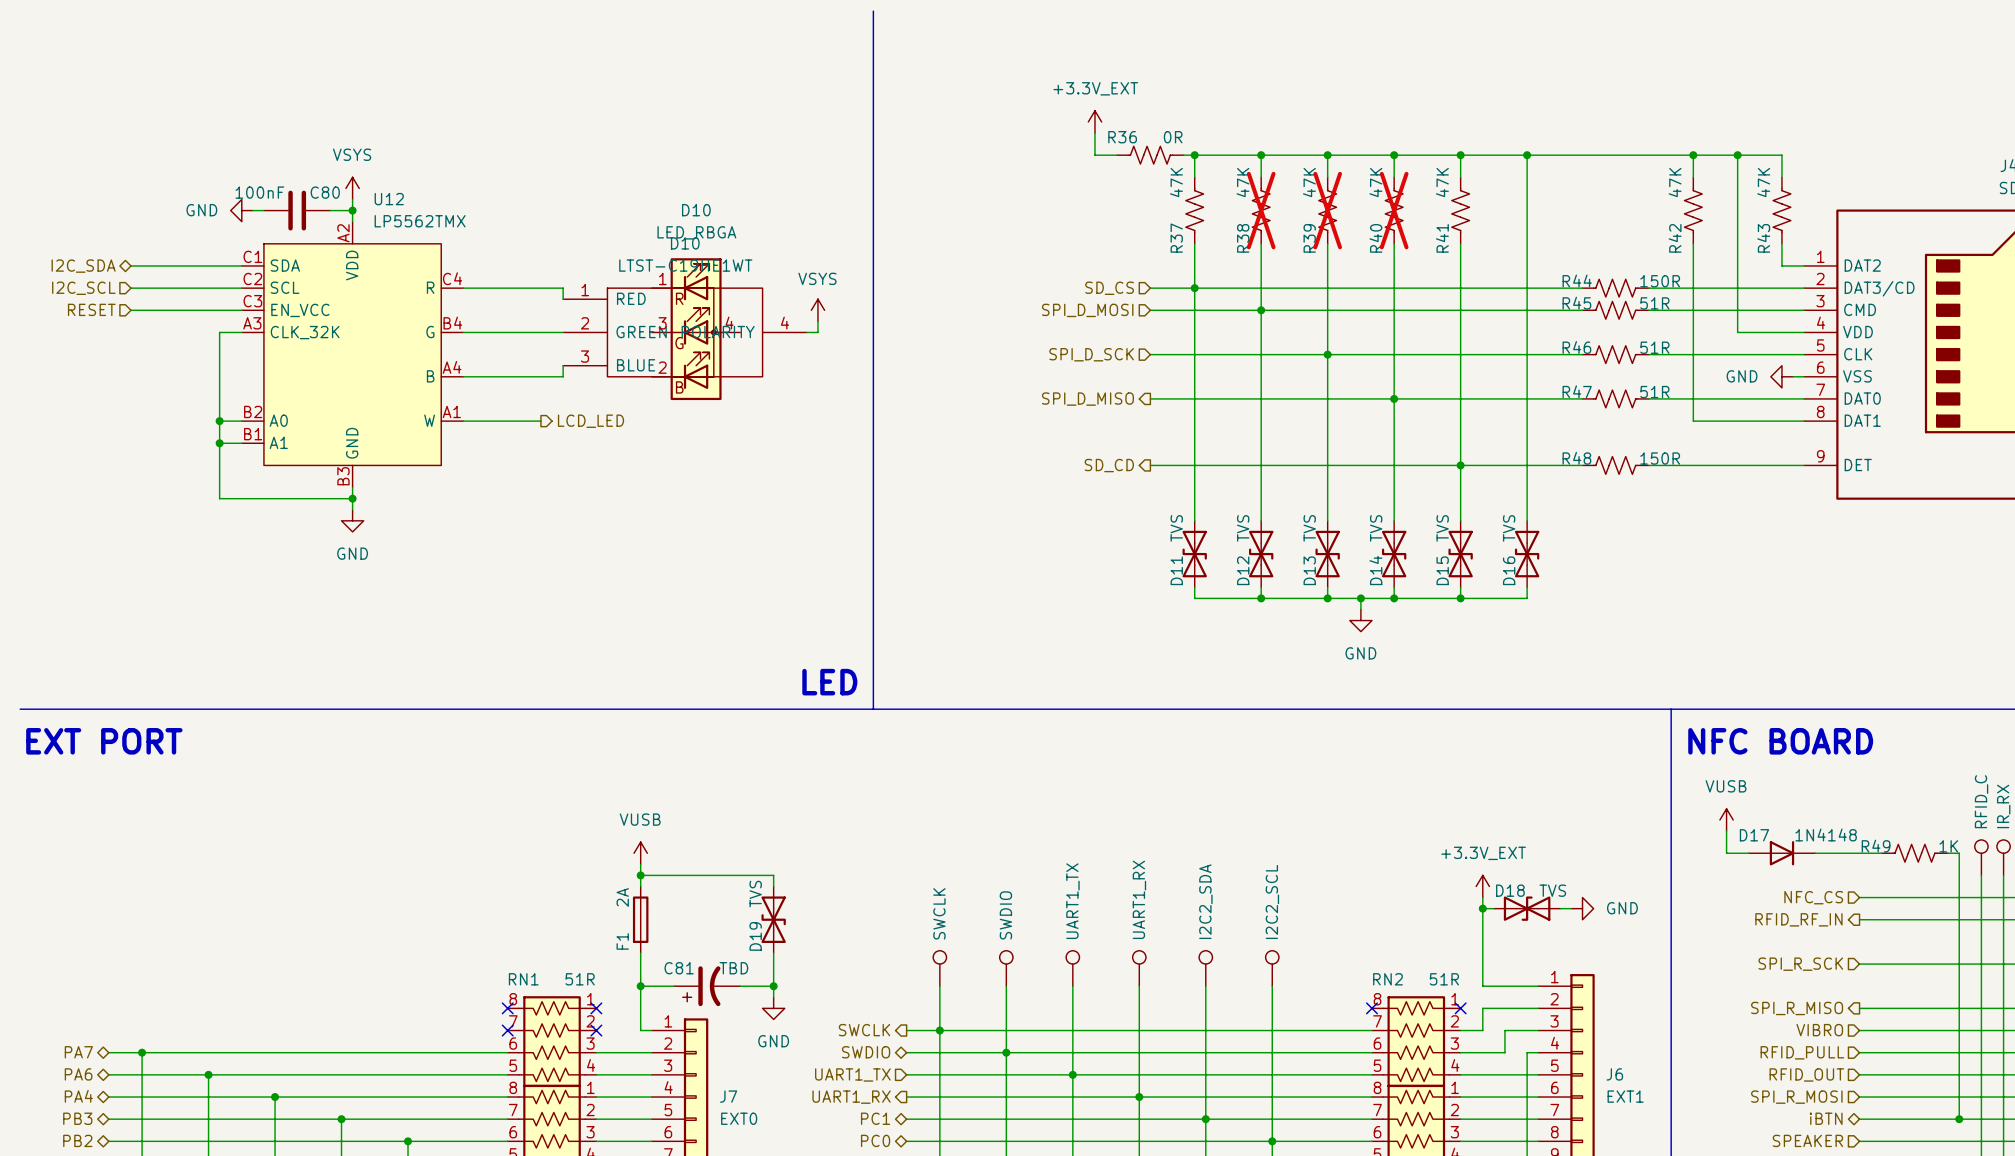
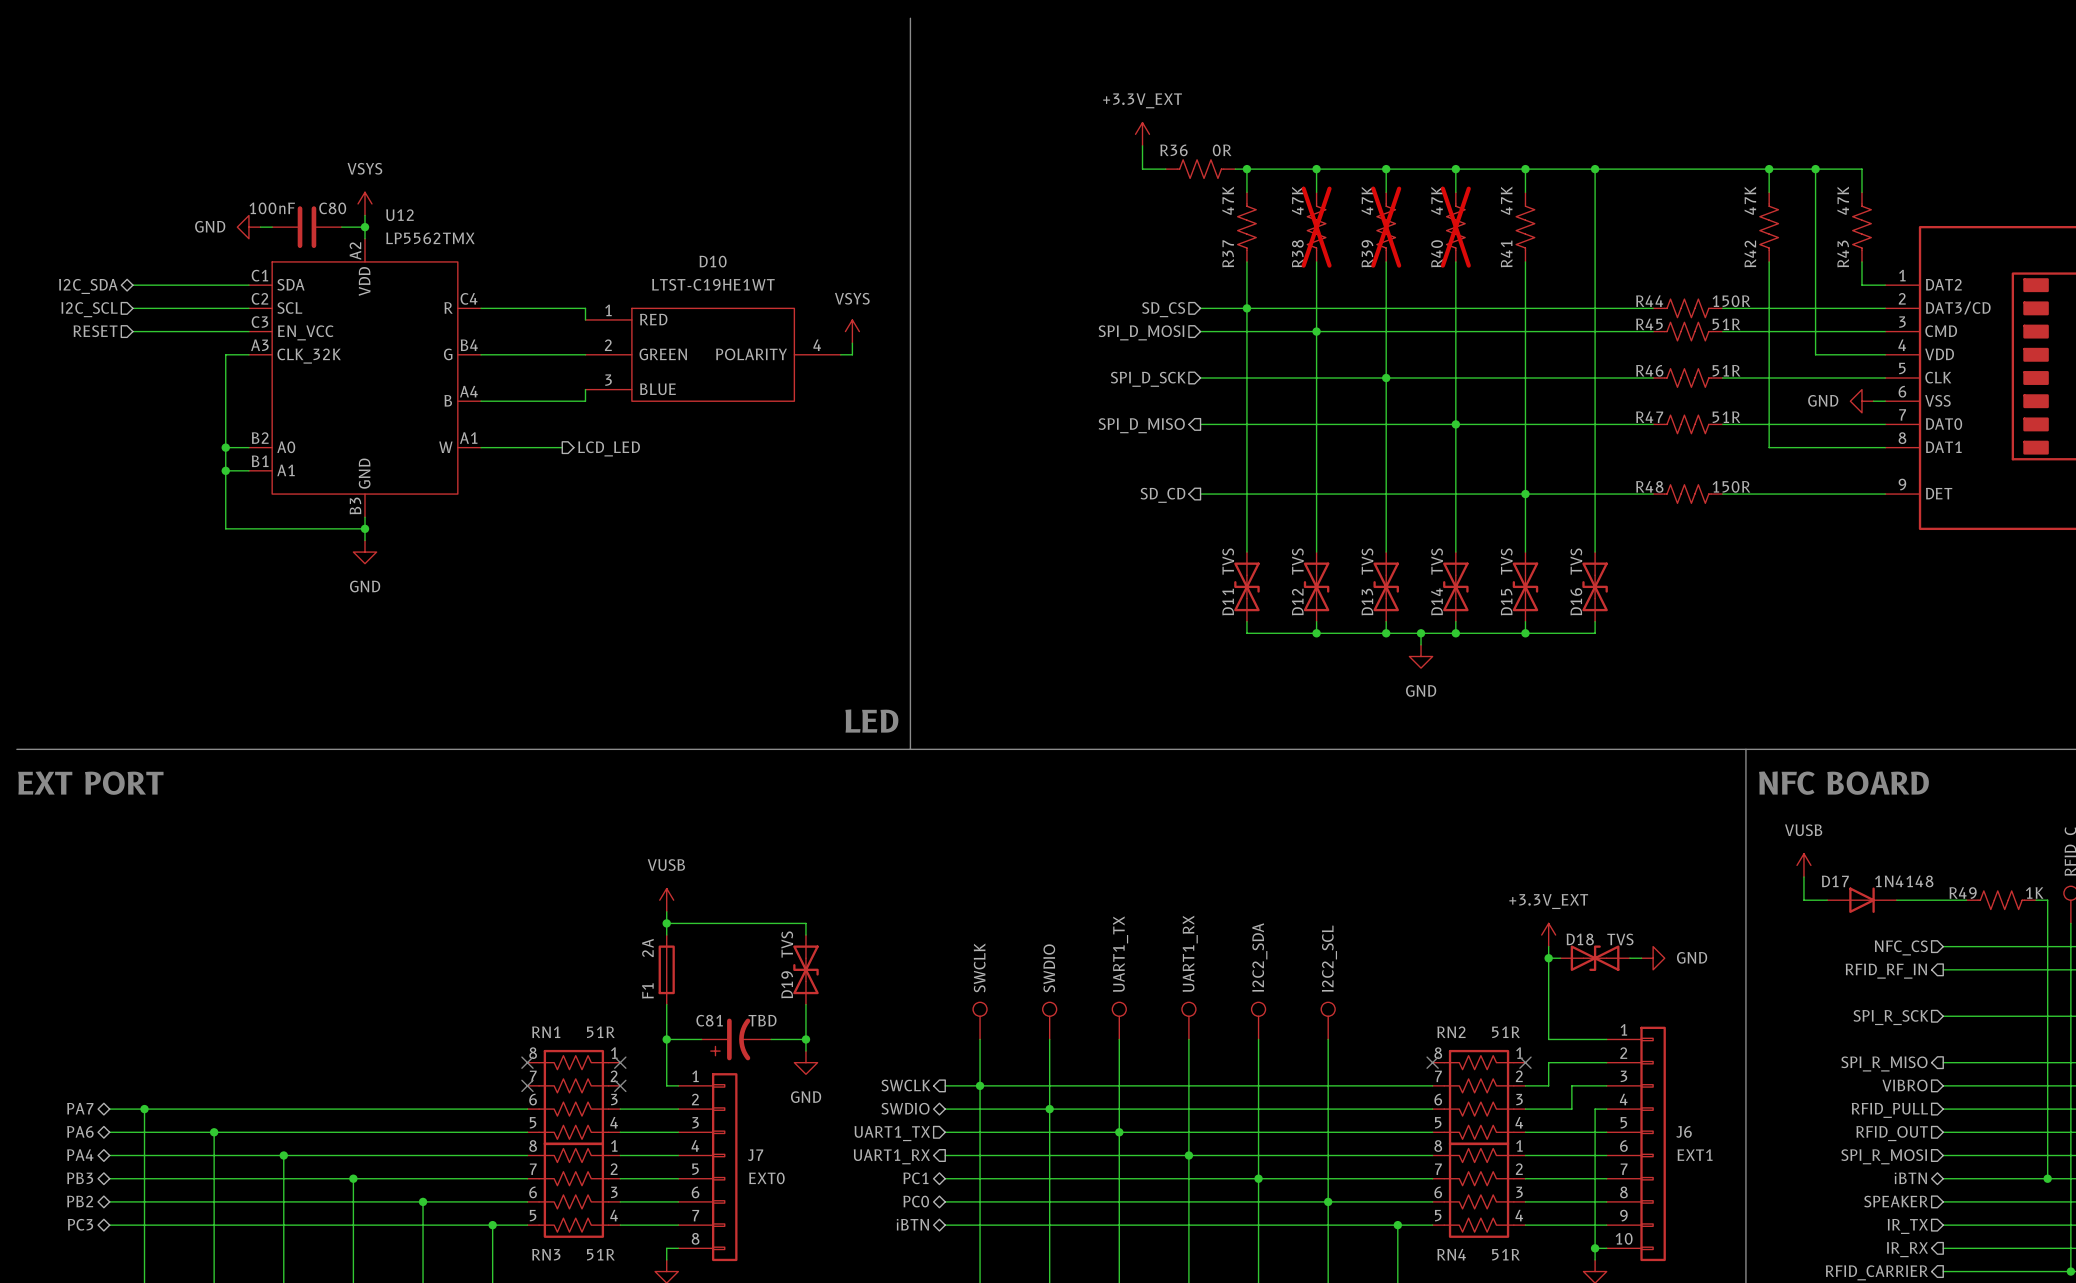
D10: LED_RBGA (696, 329) -> none

